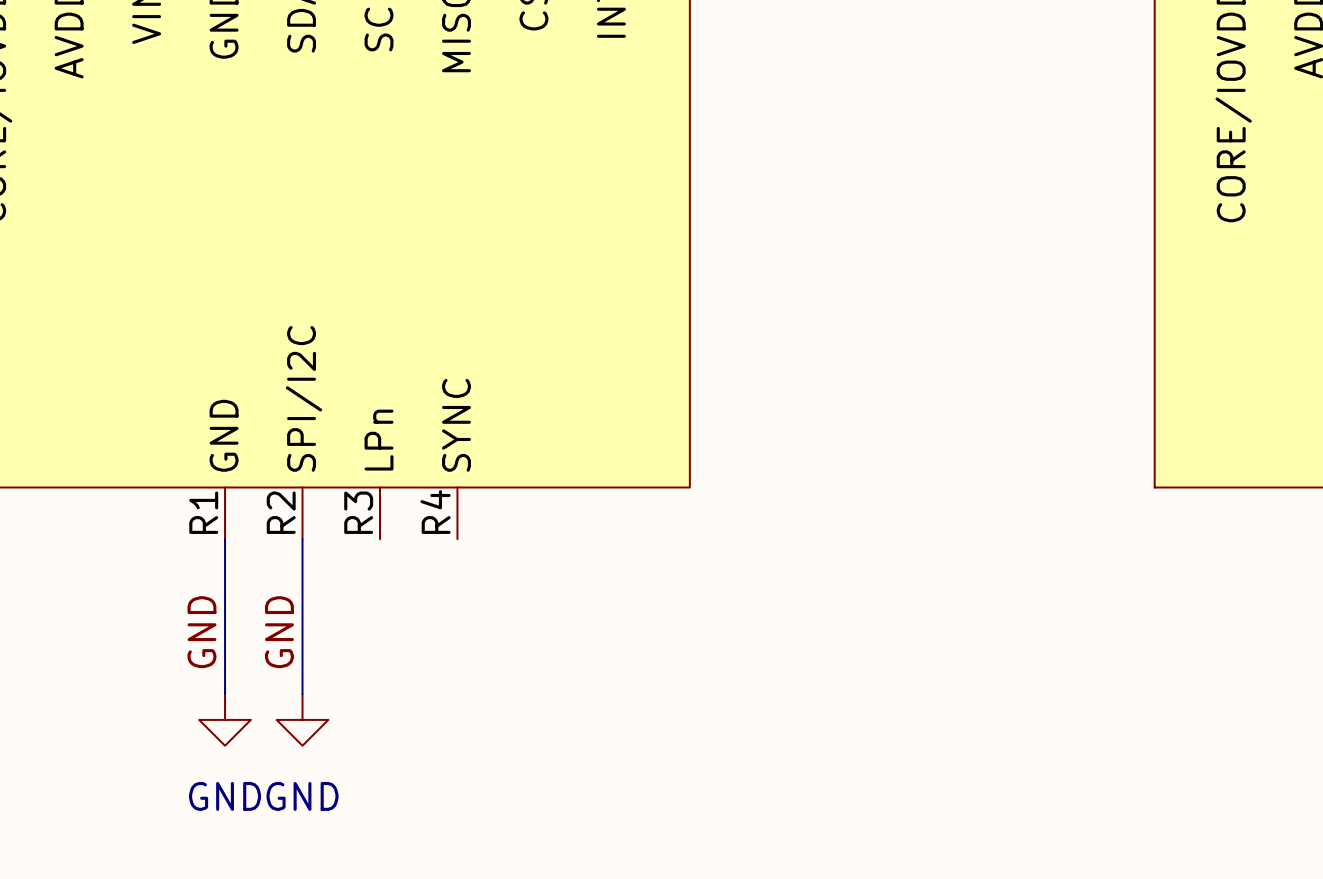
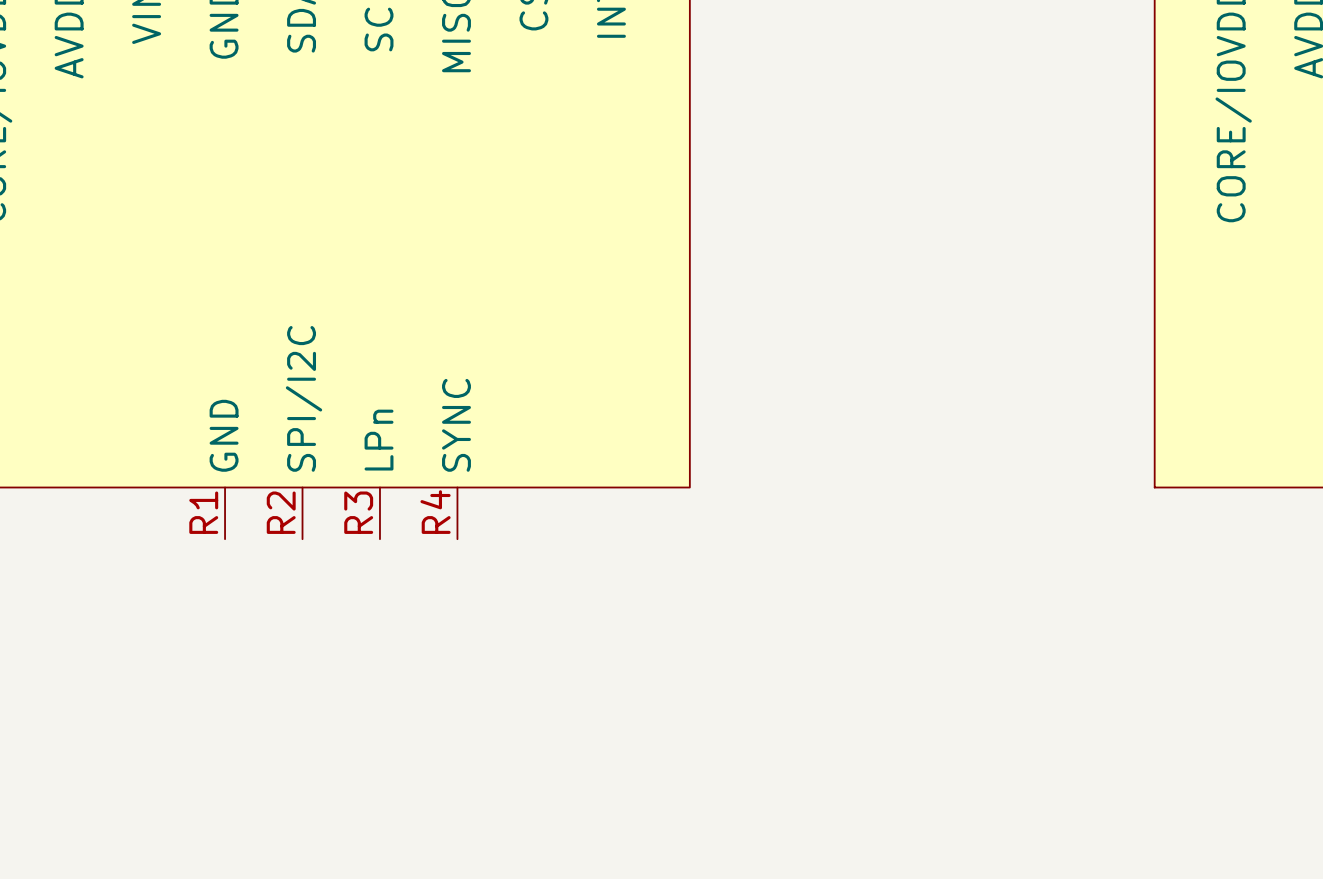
wire: (225, 539) (225, 694) -> none
wire: (302, 539) (302, 694) -> none
label: GND (201, 632) -> none
label: GND (279, 632) -> none
power symbol: GND (225, 719) -> none
power symbol: GND (302, 719) -> none

